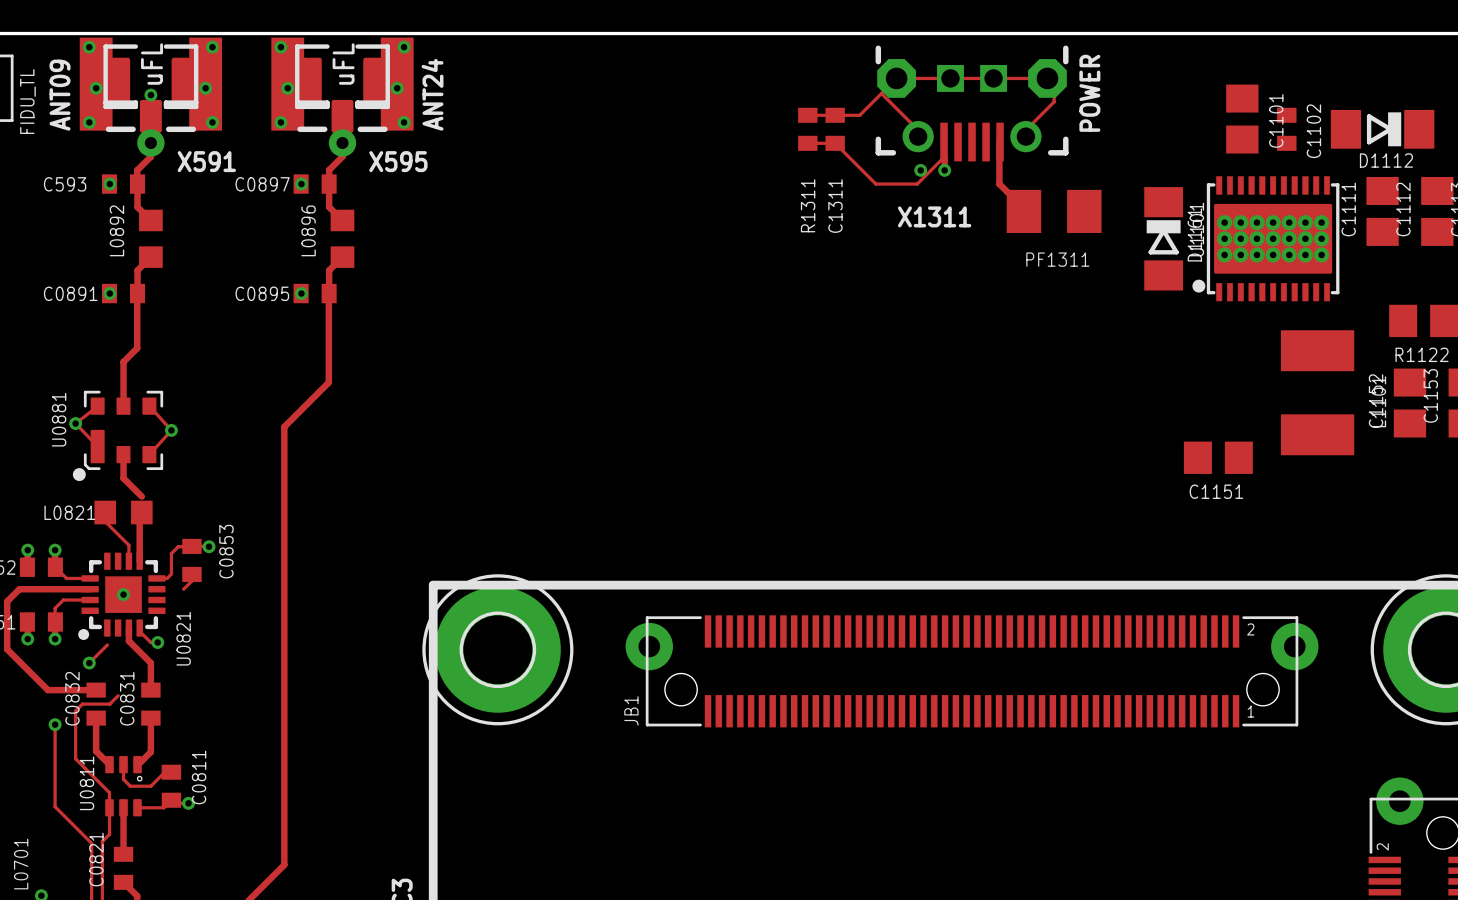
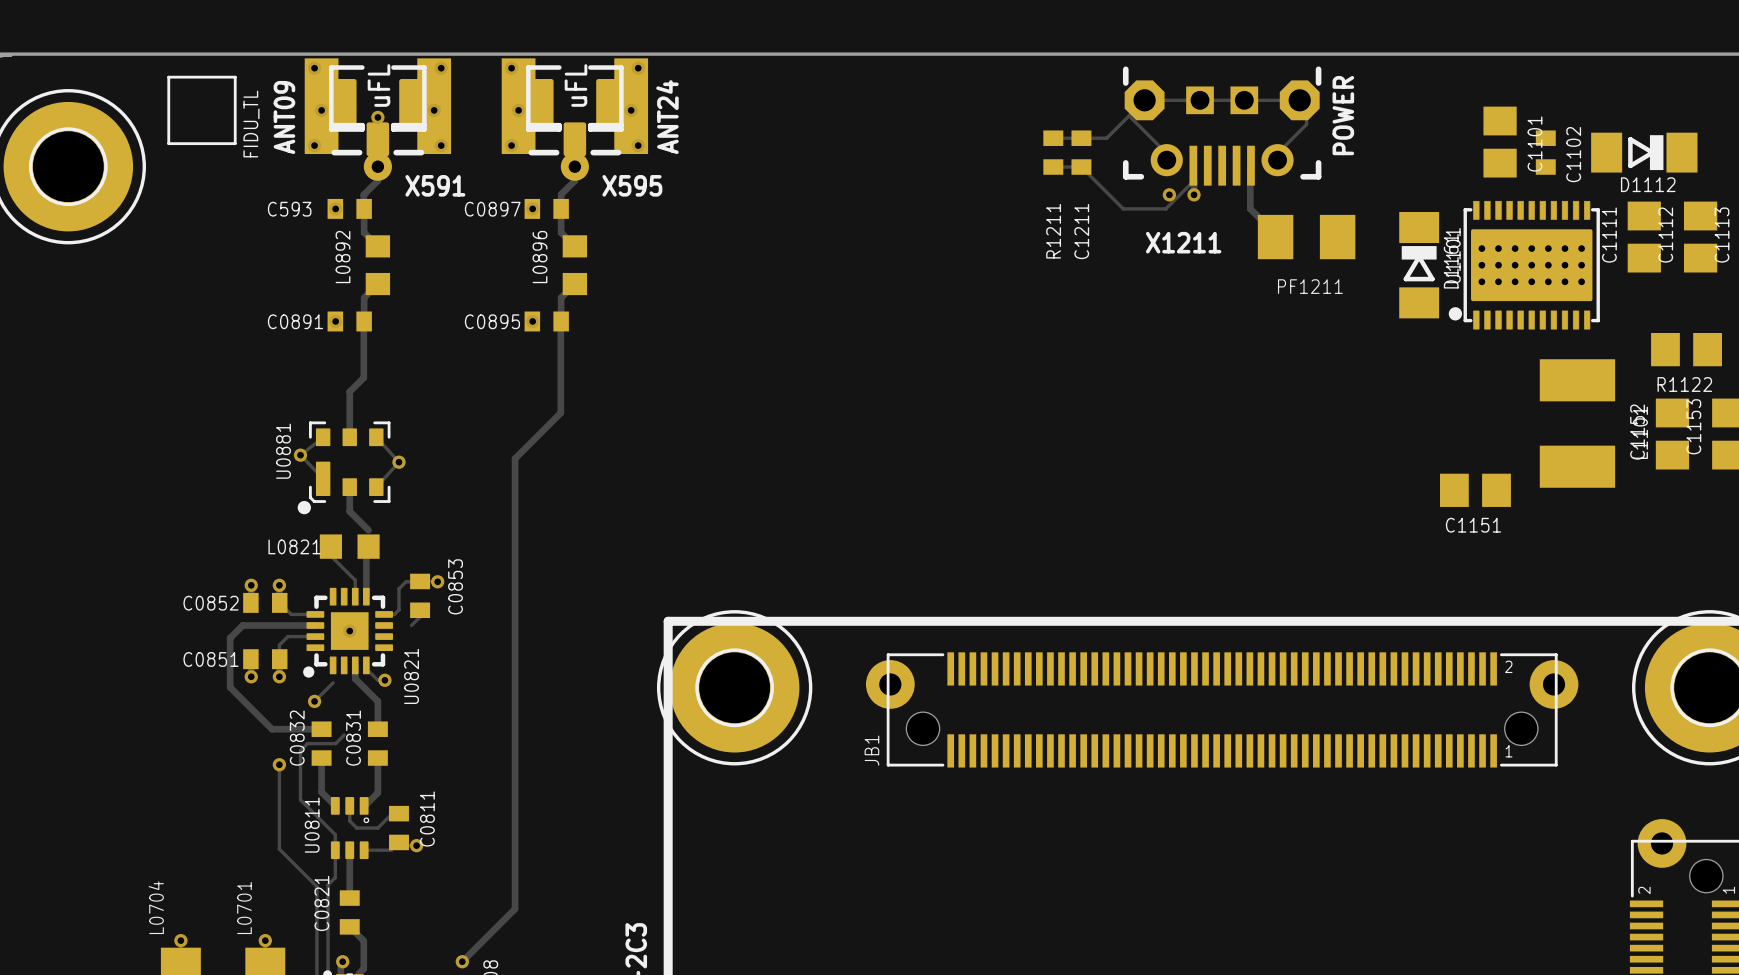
R1311 name: R1311 (808, 205) -> R1211 (1053, 231)
C1311 name: C1311 (835, 206) -> C1211 (1081, 231)
X1311 name: X1311 (934, 216) -> X1211 (1183, 242)
PF1311 name: PF1311 (1057, 259) -> PF1211 (1310, 286)

